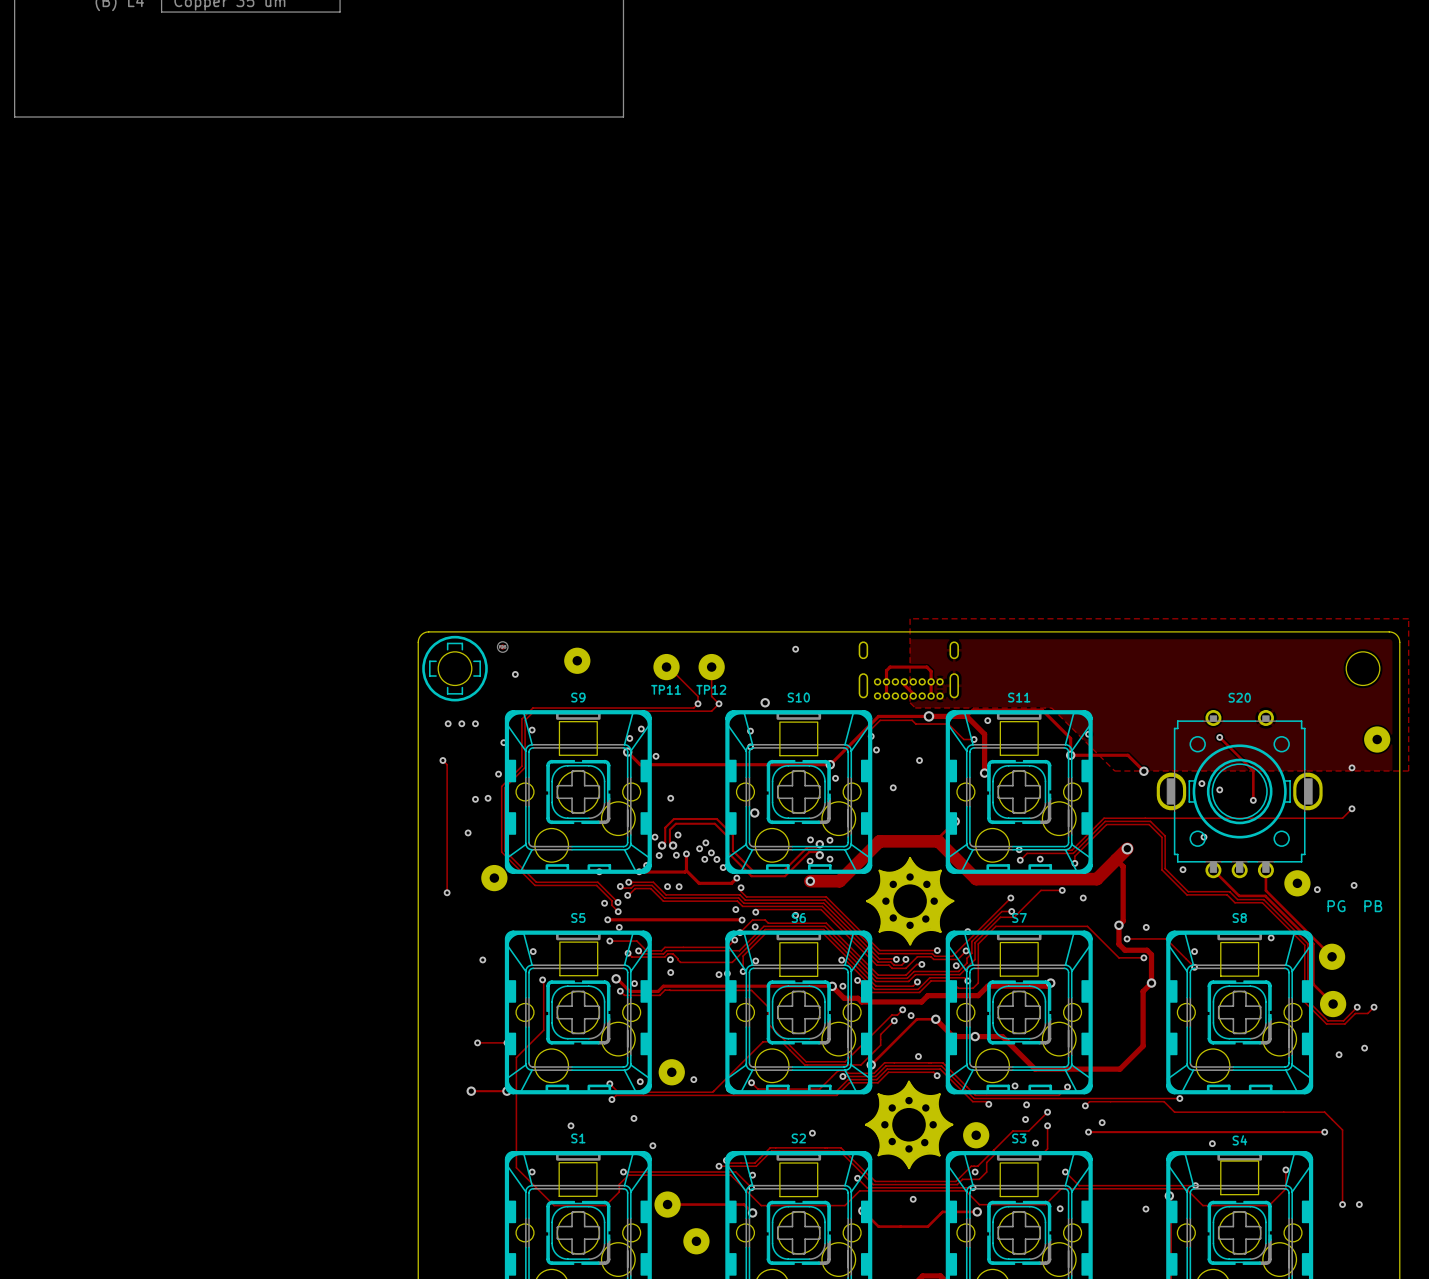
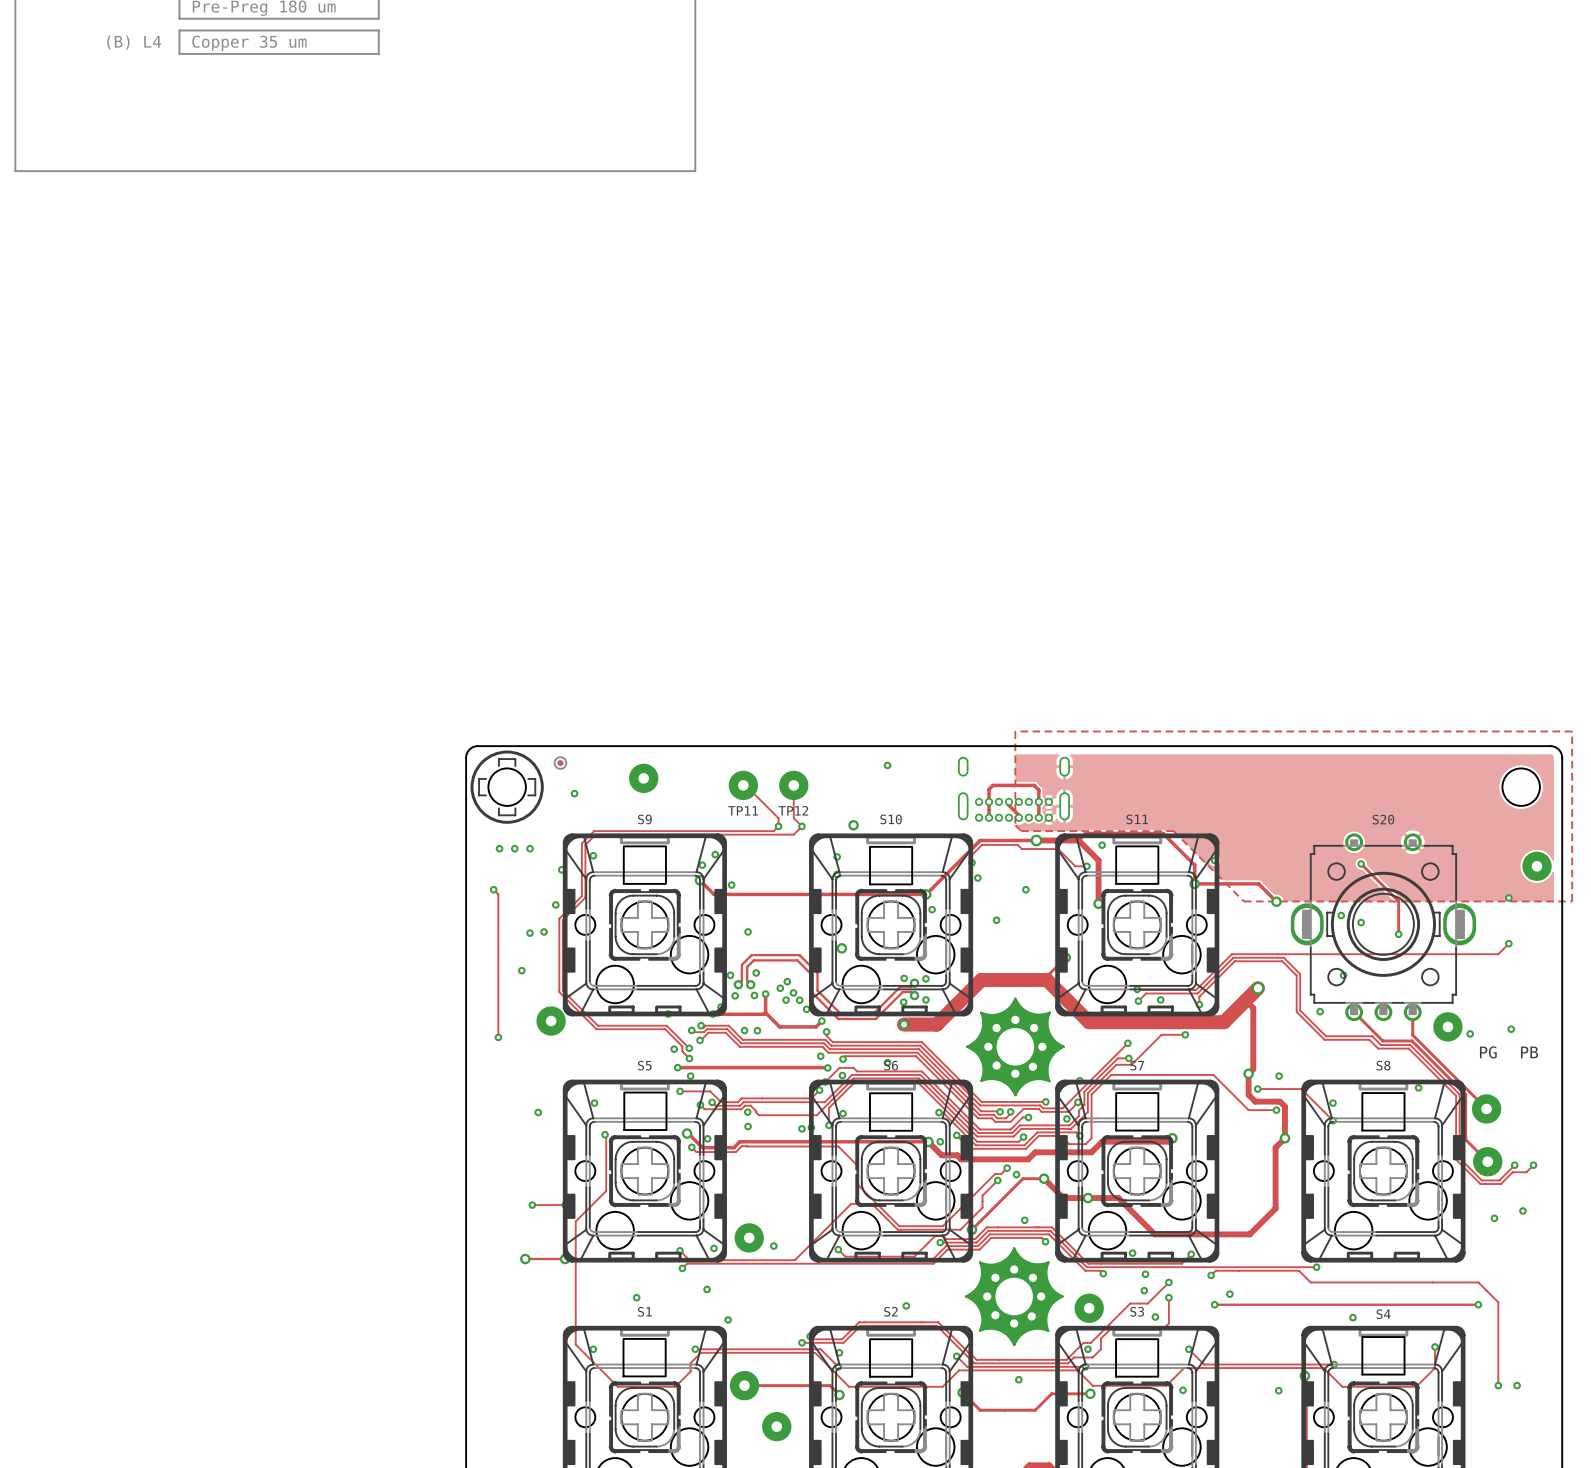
via: (1083, 898) -> none

